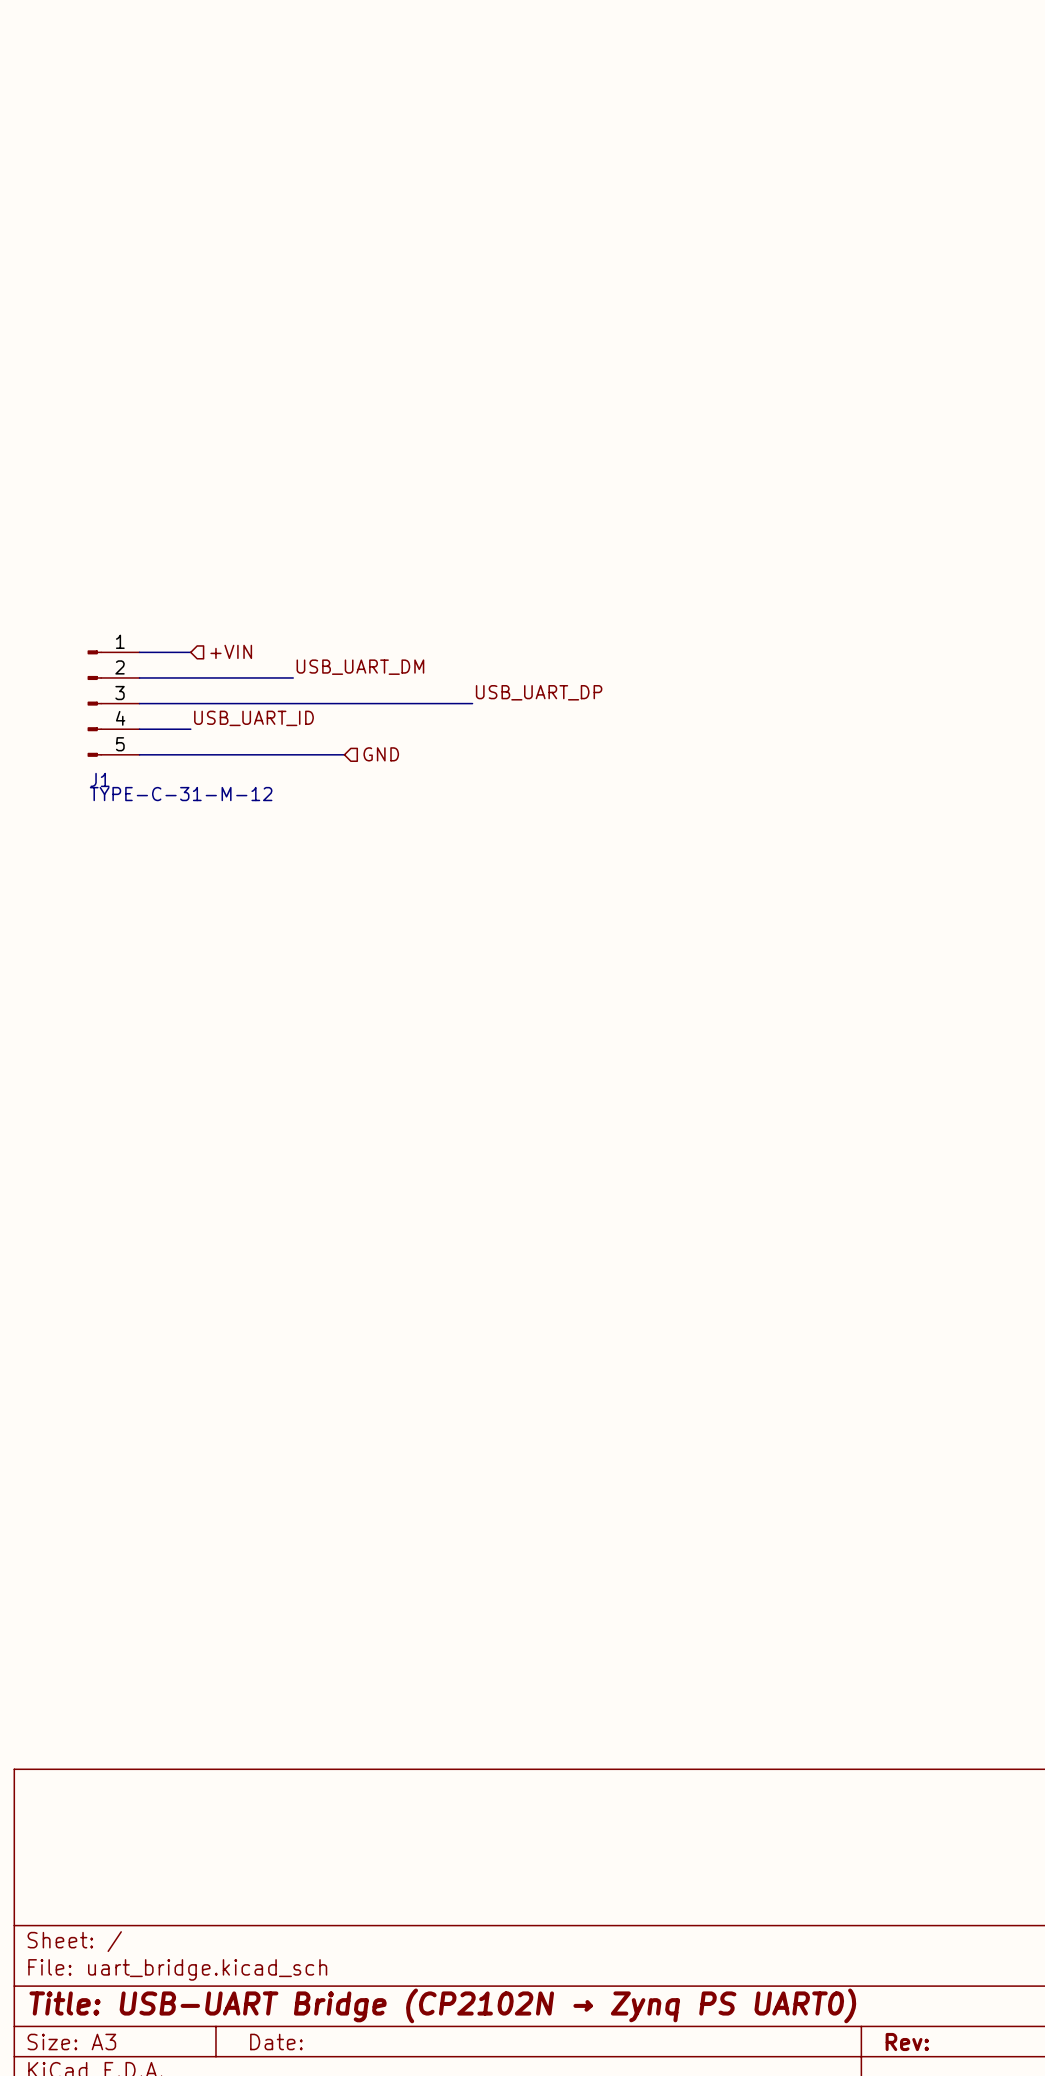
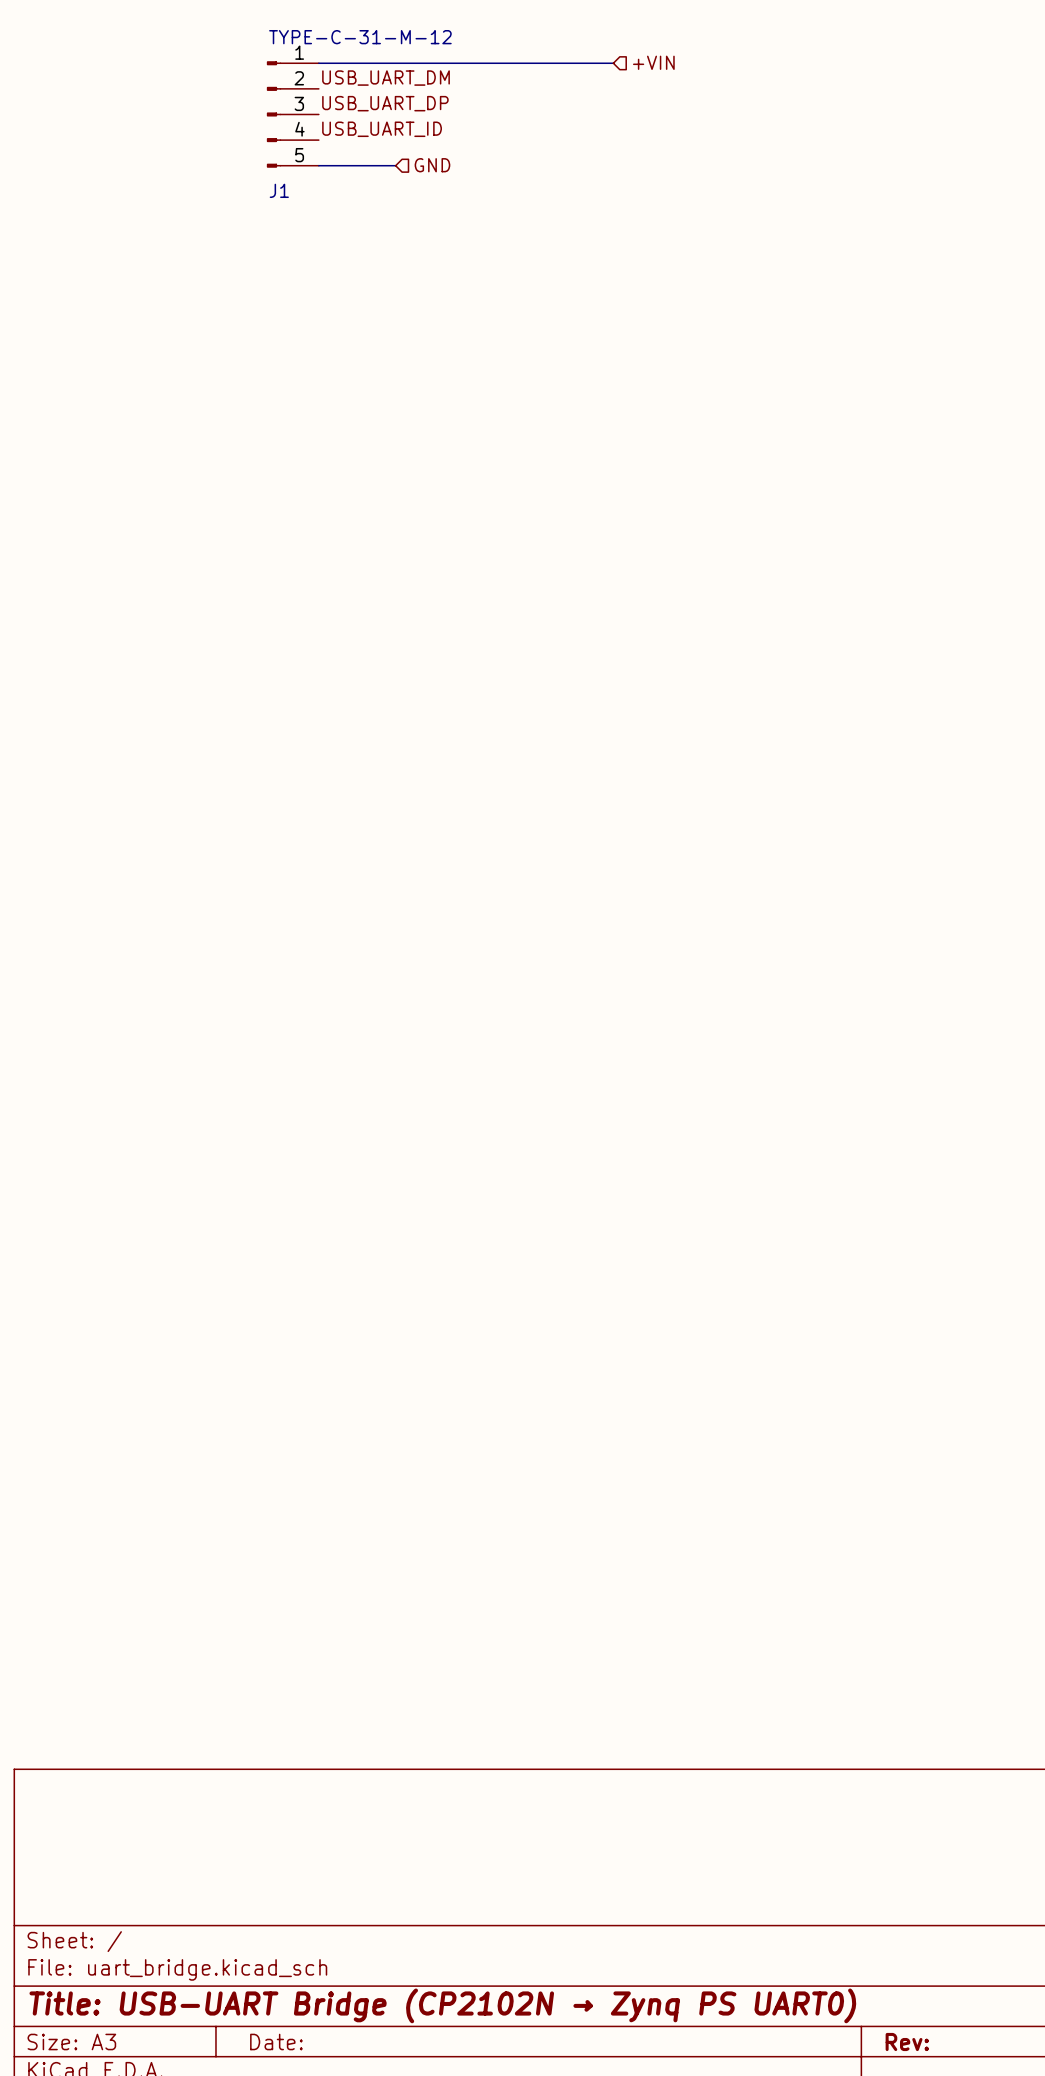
hierarchical label: none -> +VIN (653, 62)
wire: none -> (318, 63) (613, 63)
label: none -> USB_UART_DM (386, 78)
label: none -> USB_UART_DP (385, 103)
label: none -> USB_UART_ID (382, 129)
wire: none -> (318, 165) (395, 165)
hierarchical label: none -> GND (432, 165)
hierarchical label: +VIN (231, 651) -> none
wire: (139, 652) (190, 652) -> none
label: USB_UART_DM (360, 667) -> none
wire: (139, 677) (293, 677) -> none
label: USB_UART_DP (539, 692) -> none
J1 position: (113, 703) -> (292, 114)
wire: (139, 703) (472, 703) -> none
label: USB_UART_ID (253, 718) -> none
wire: (139, 729) (190, 729) -> none
wire: (139, 754) (344, 754) -> none
hierarchical label: GND (381, 754) -> none
J1 value position: TYPE-C-31-M-12 (181, 794) -> TYPE-C-31-M-12 (360, 37)

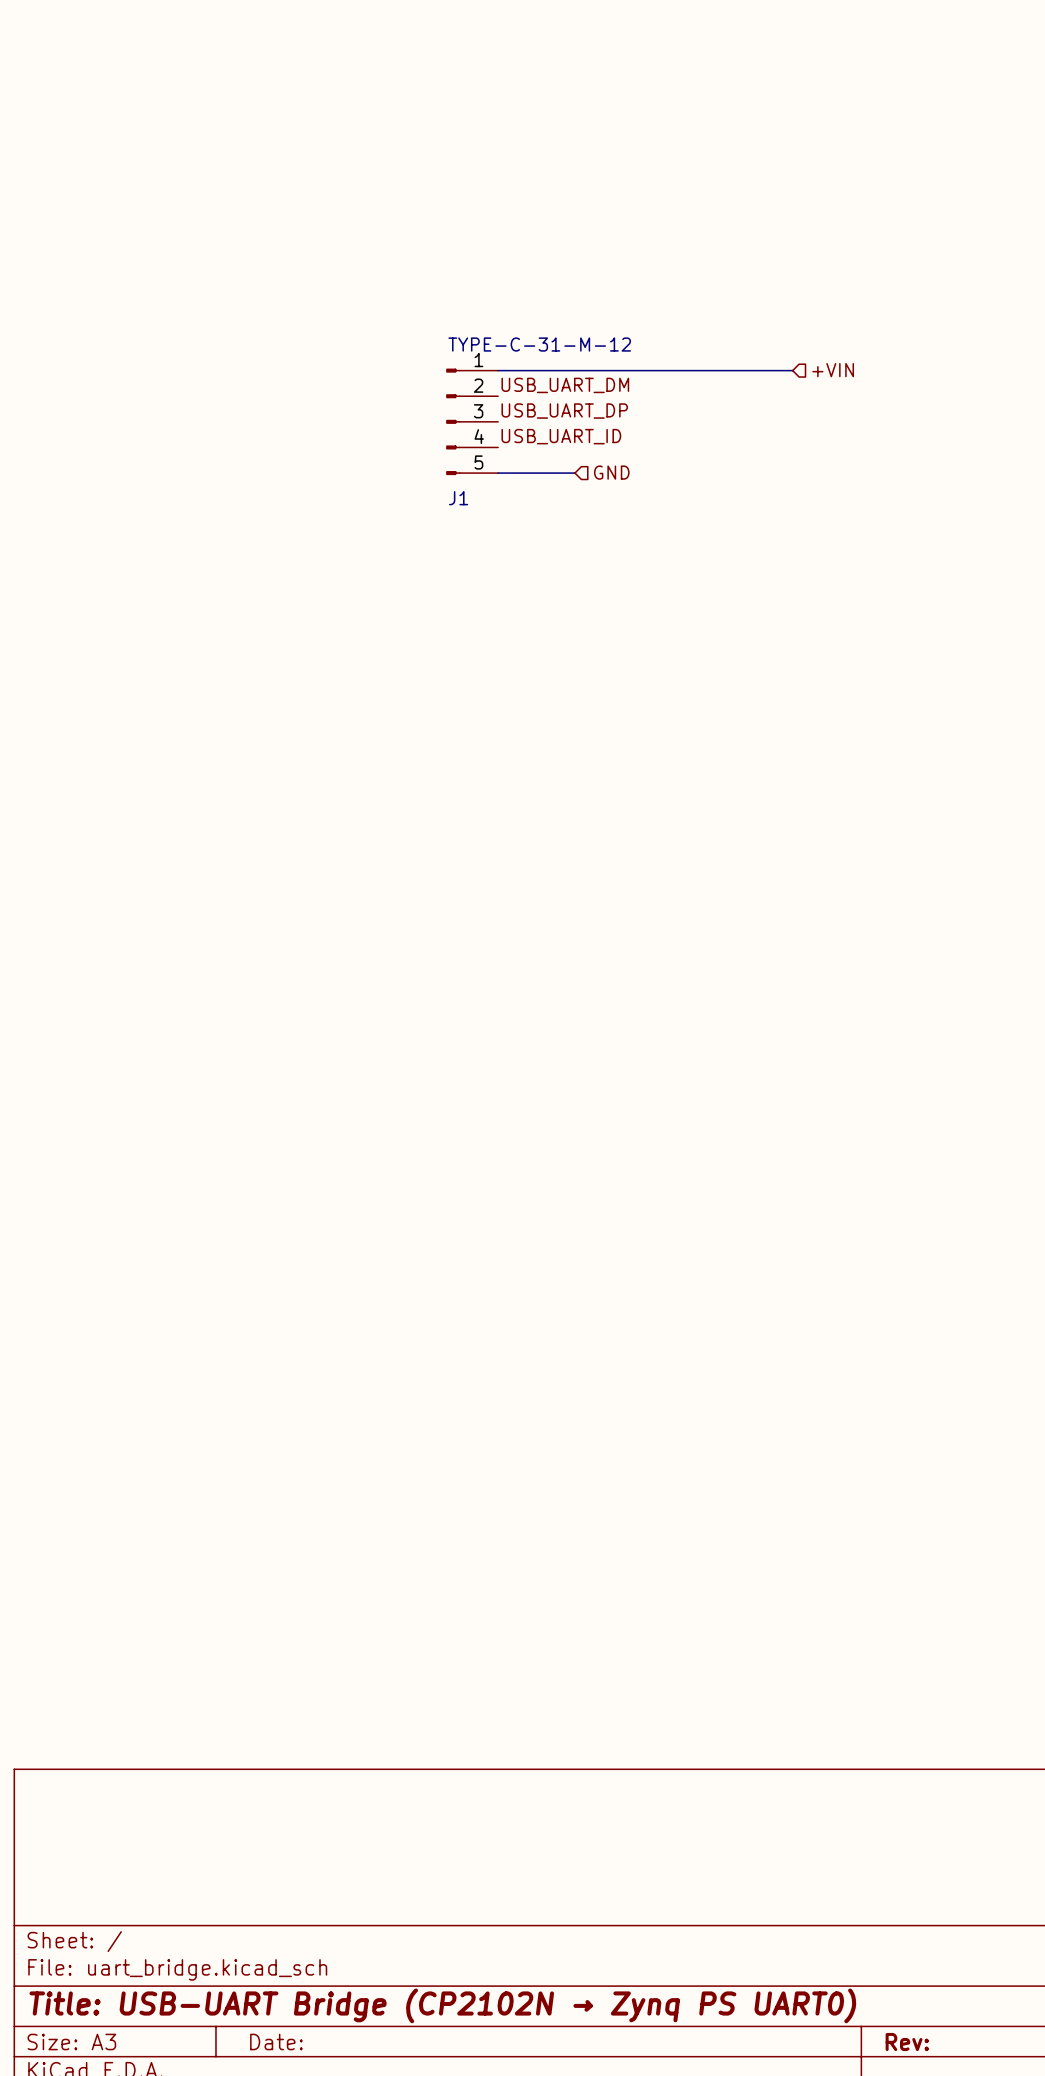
hierarchical label: +VIN (653, 62) -> none
wire: (318, 63) (613, 63) -> none
label: USB_UART_DM (386, 78) -> none
label: USB_UART_DP (385, 103) -> none
J1 position: (292, 114) -> (472, 421)
label: USB_UART_ID (382, 129) -> none
wire: (318, 165) (395, 165) -> none
hierarchical label: GND (432, 165) -> none
wire: none -> (498, 370) (792, 370)
hierarchical label: none -> +VIN (833, 370)
label: none -> USB_UART_DM (565, 385)
label: none -> USB_UART_DP (564, 411)
label: none -> USB_UART_ID (561, 436)
hierarchical label: none -> GND (611, 472)
wire: none -> (498, 473) (574, 473)

